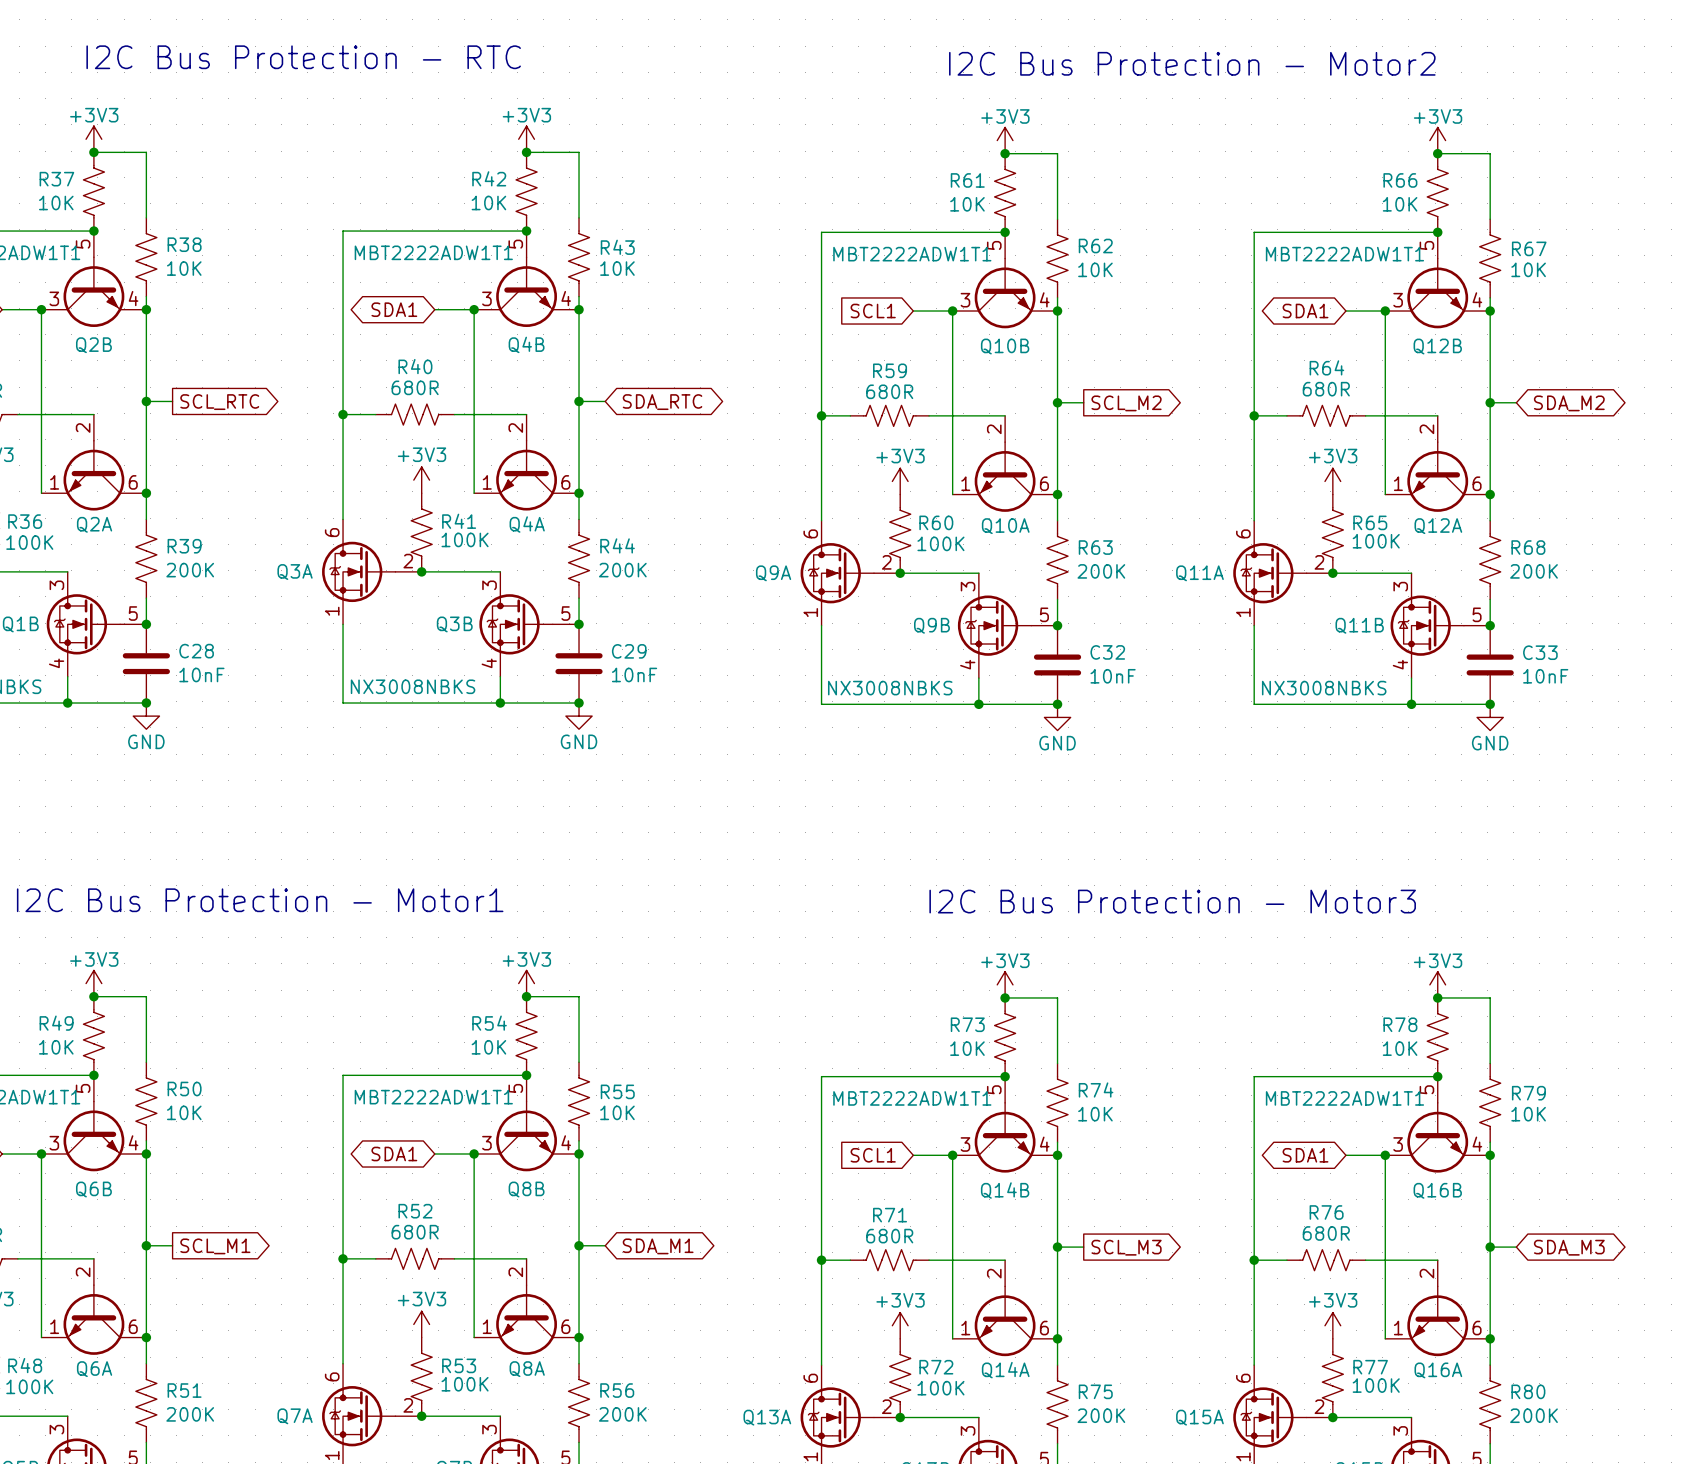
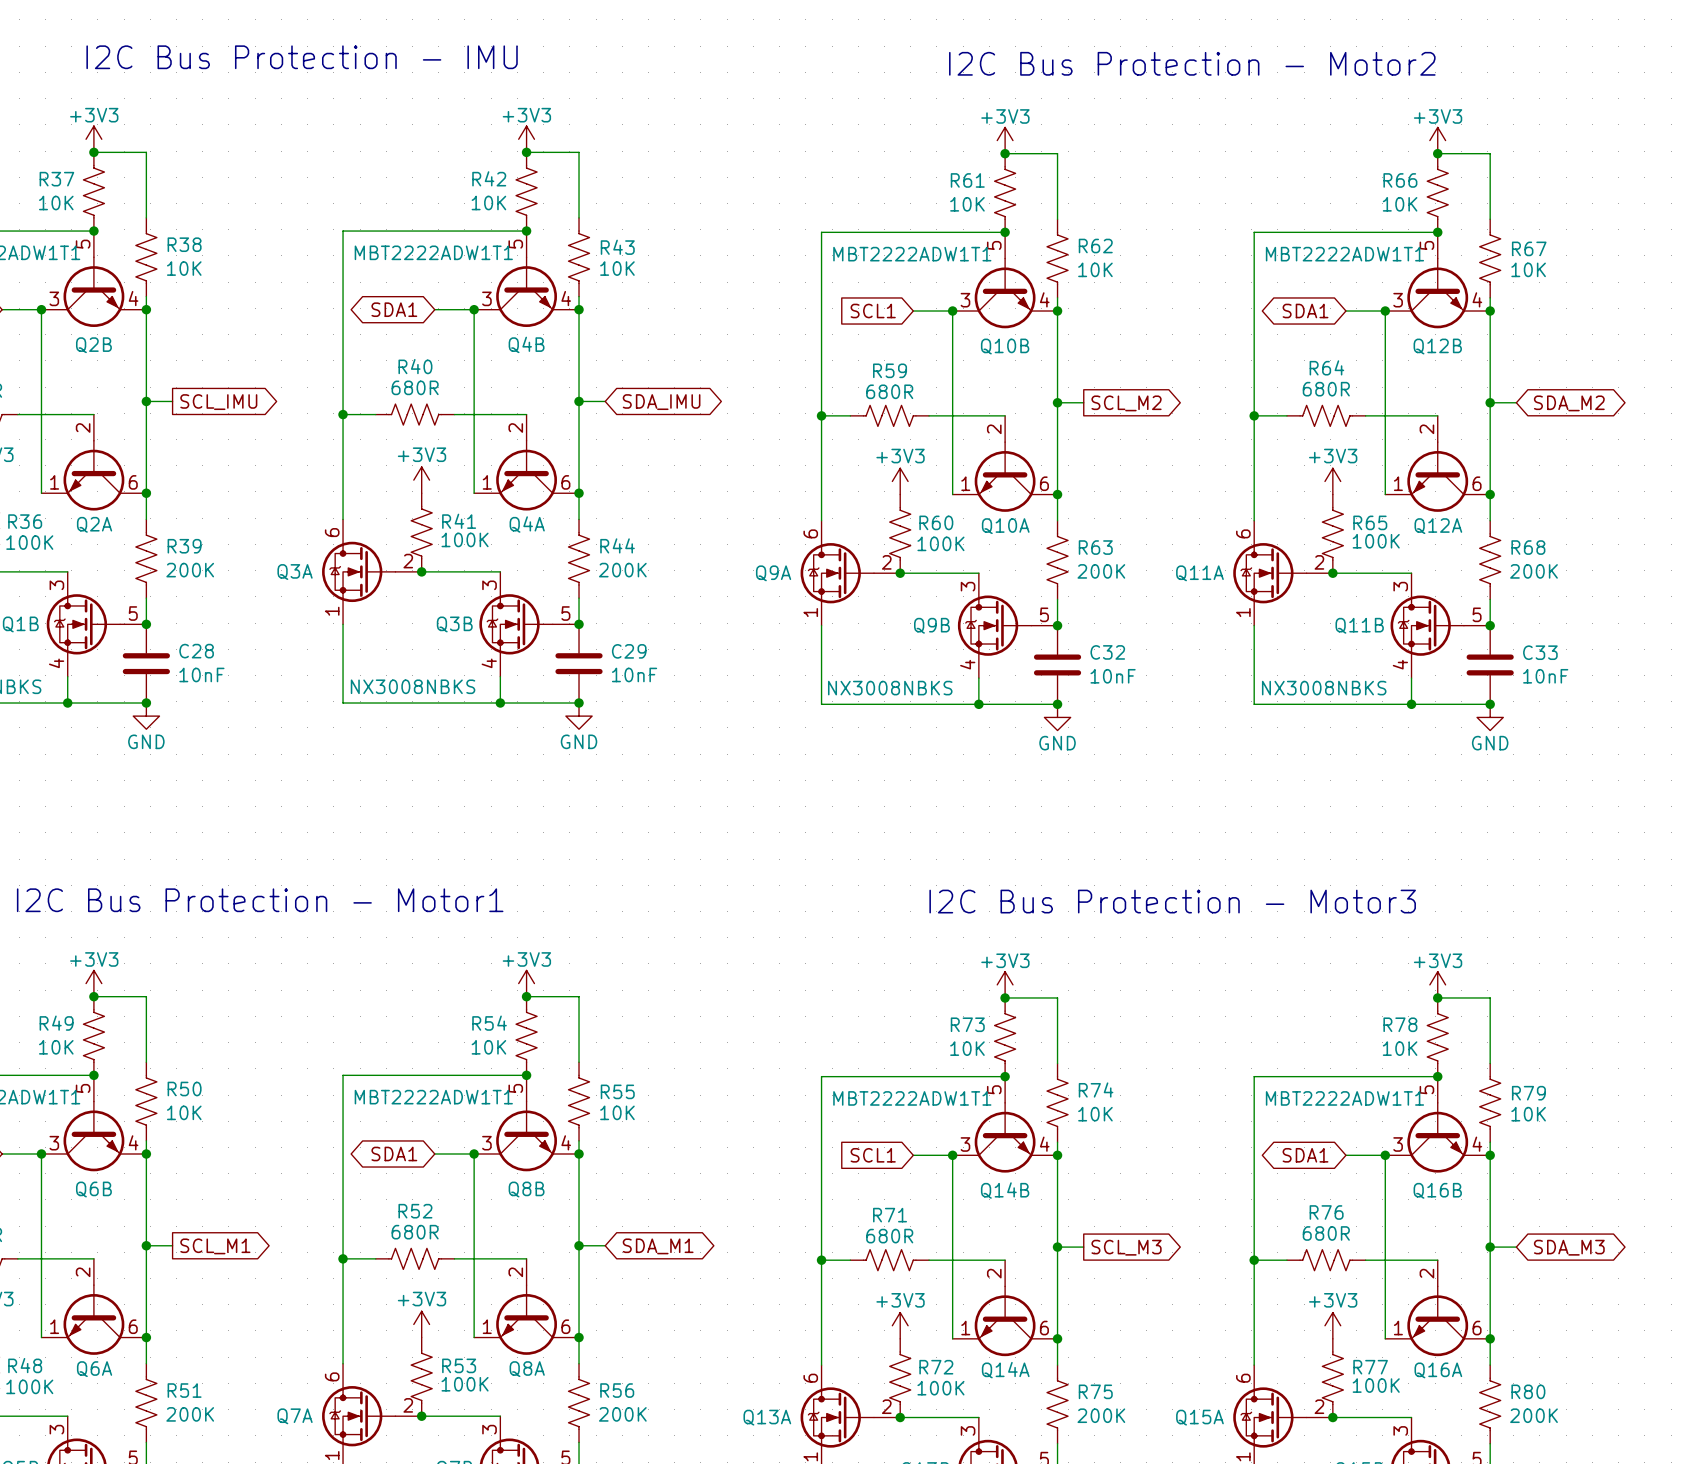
text: I2C Bus Protection - RTC (303, 57) -> I2C Bus Protection - IMU (302, 57)
global label: SCL_RTC (219, 402) -> SCL_IMU (218, 402)
global label: SDA_RTC (662, 402) -> SDA_IMU (661, 402)

